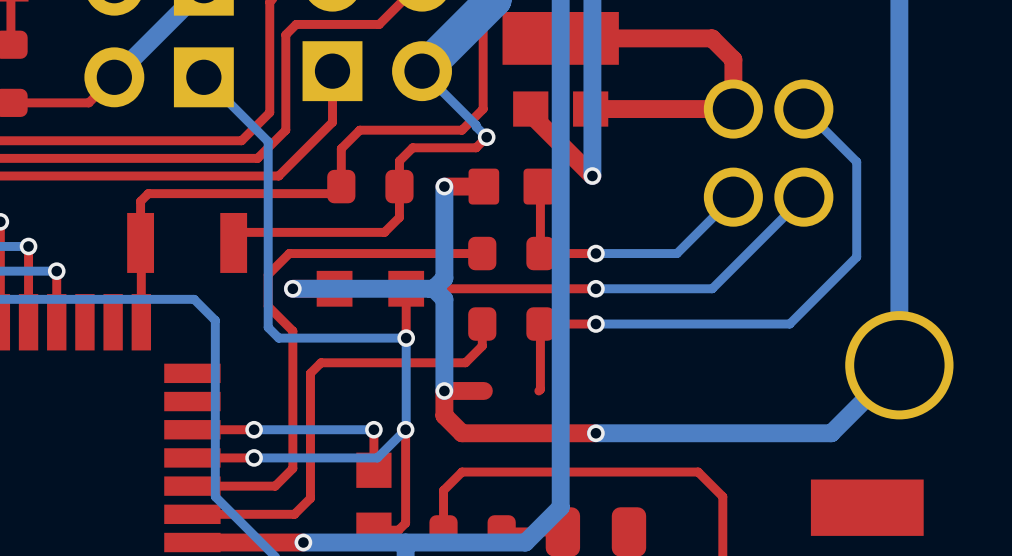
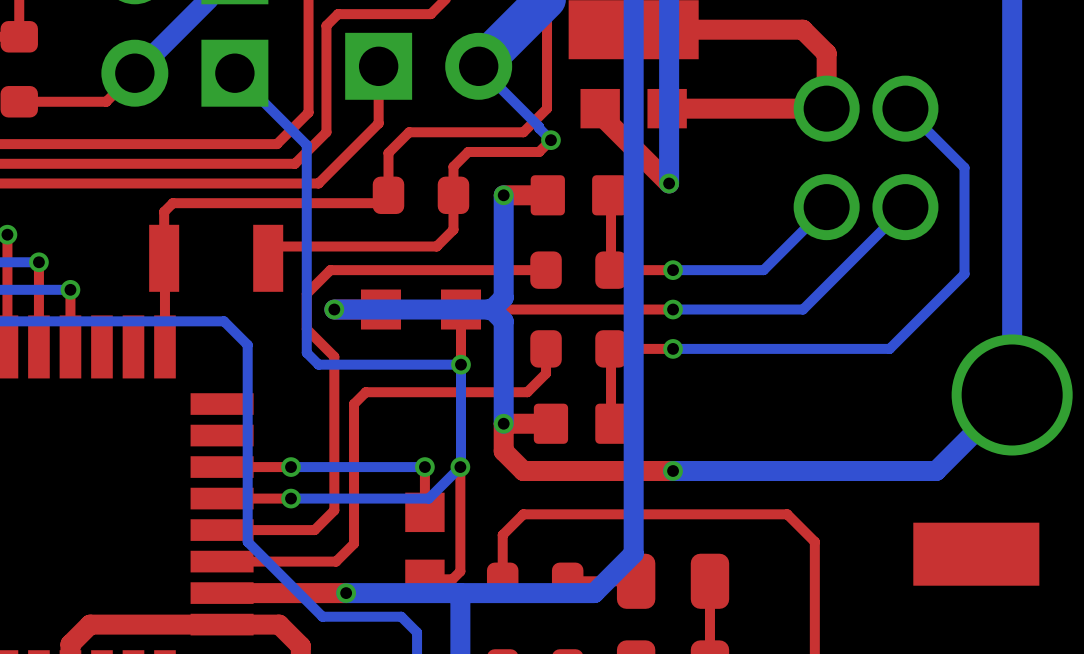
part: none -> (581, 423)

